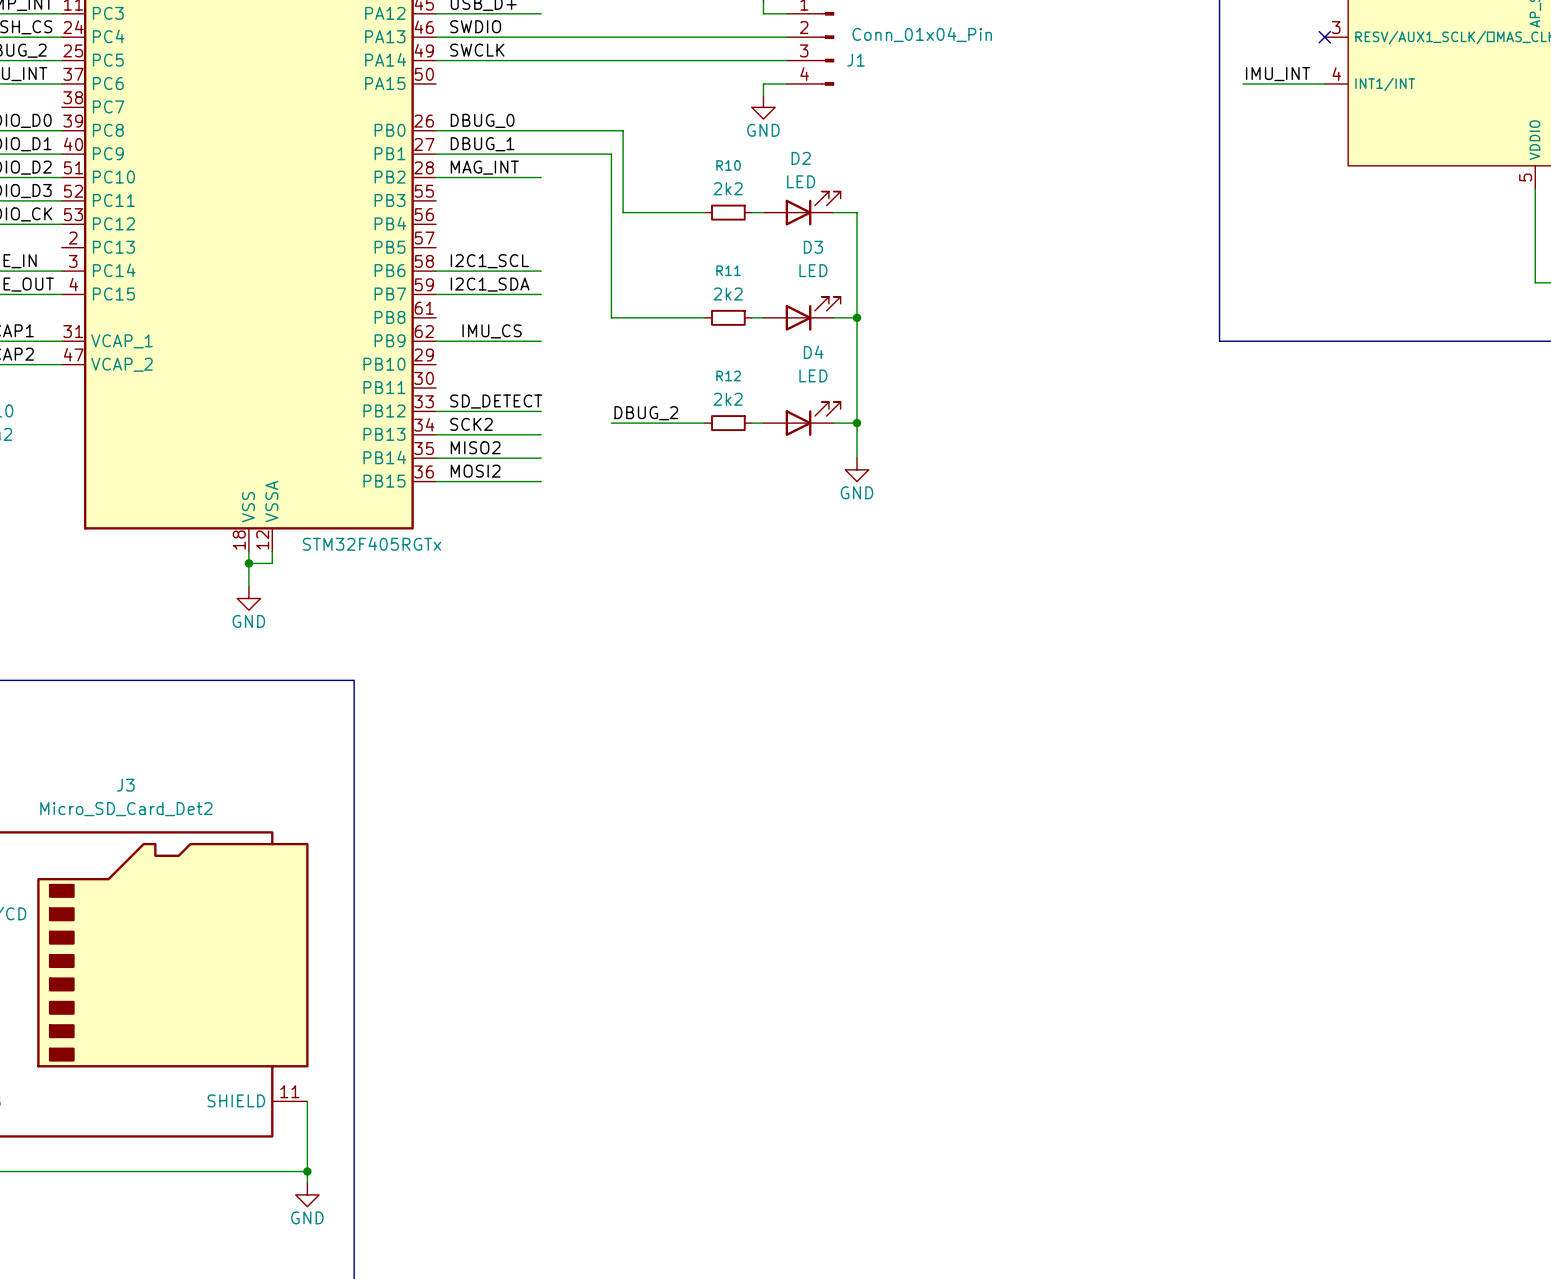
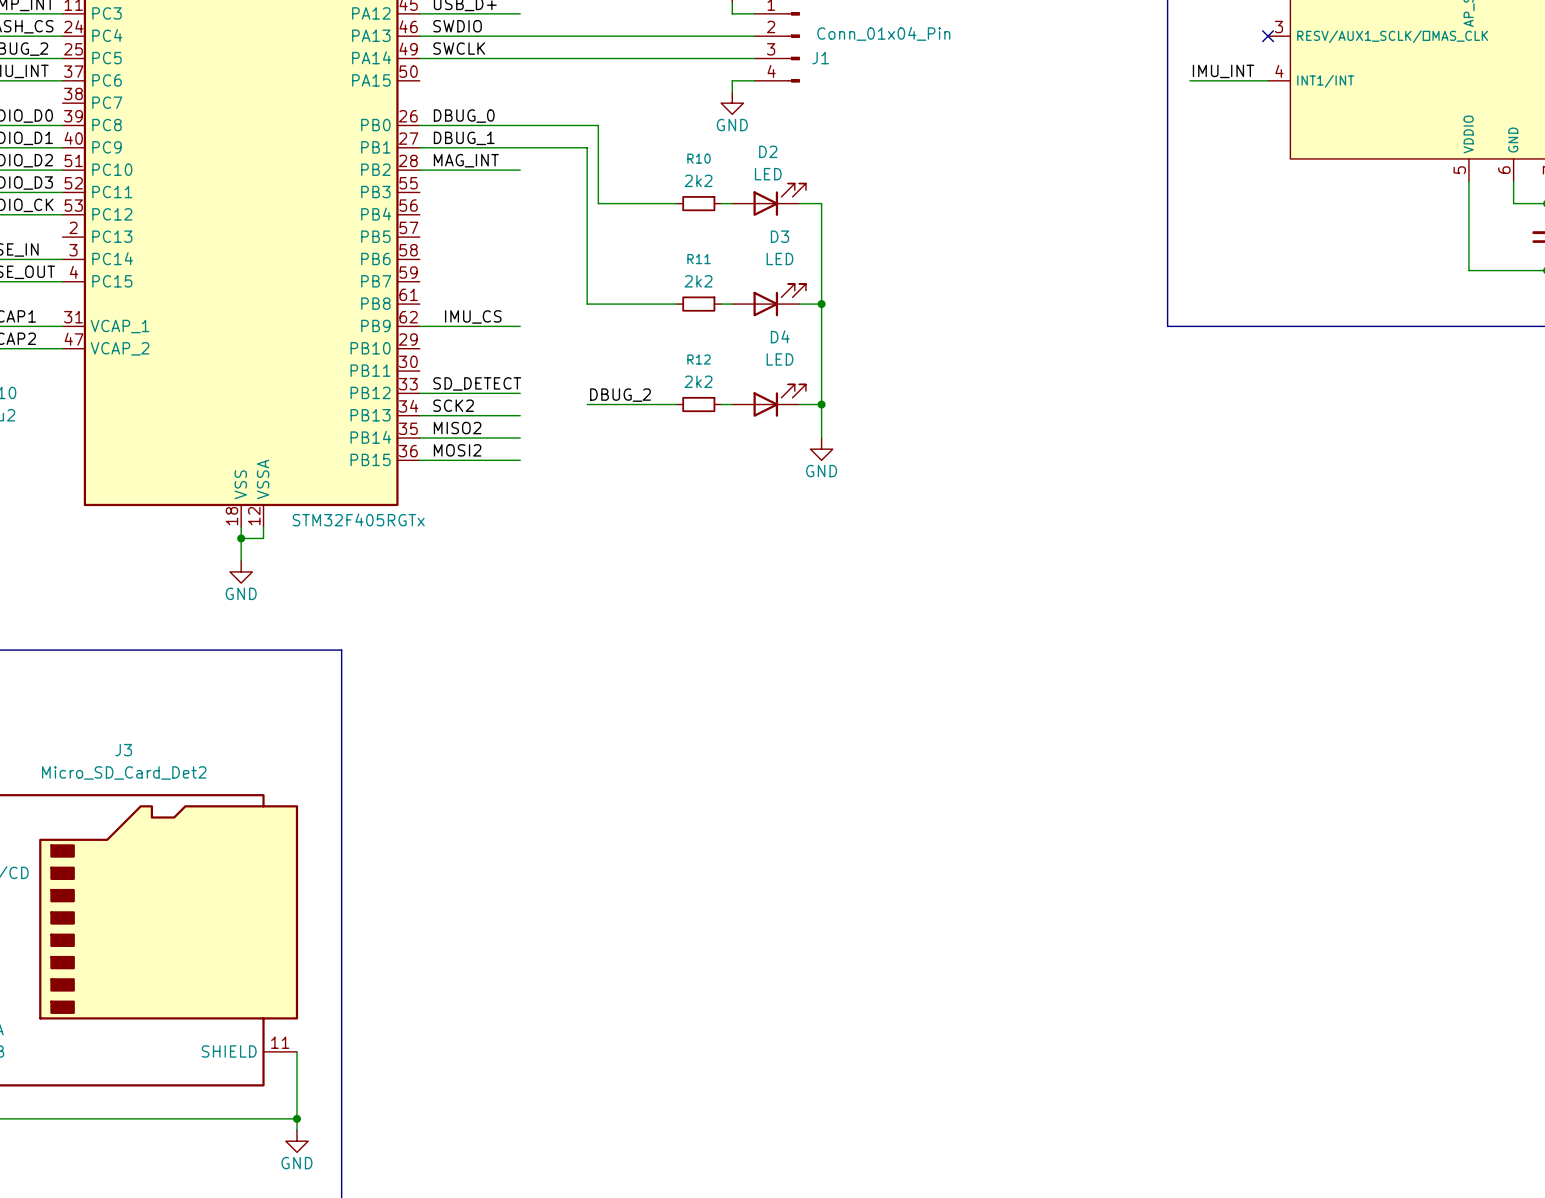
label: I2C1_SCL (489, 261) -> none
wire: (436, 271) (541, 271) -> none
label: I2C1_SDA (490, 284) -> none
wire: (436, 294) (541, 294) -> none

